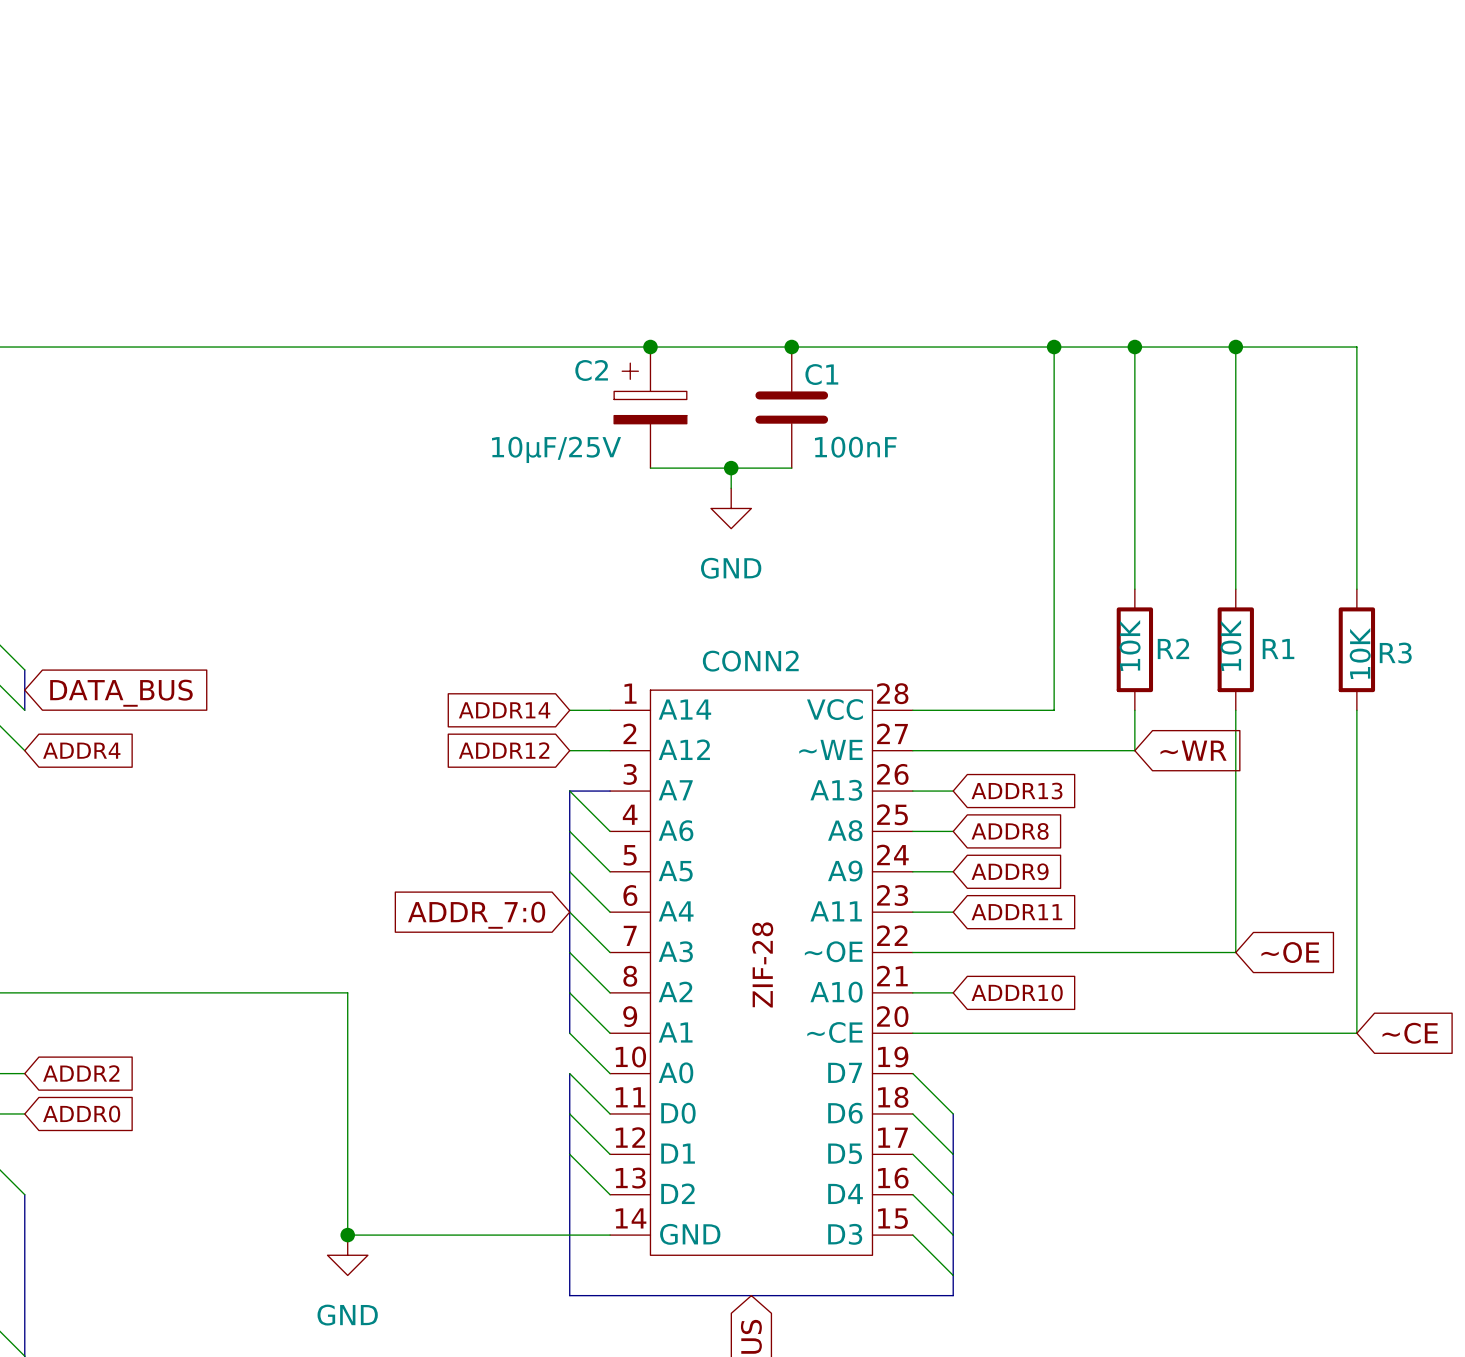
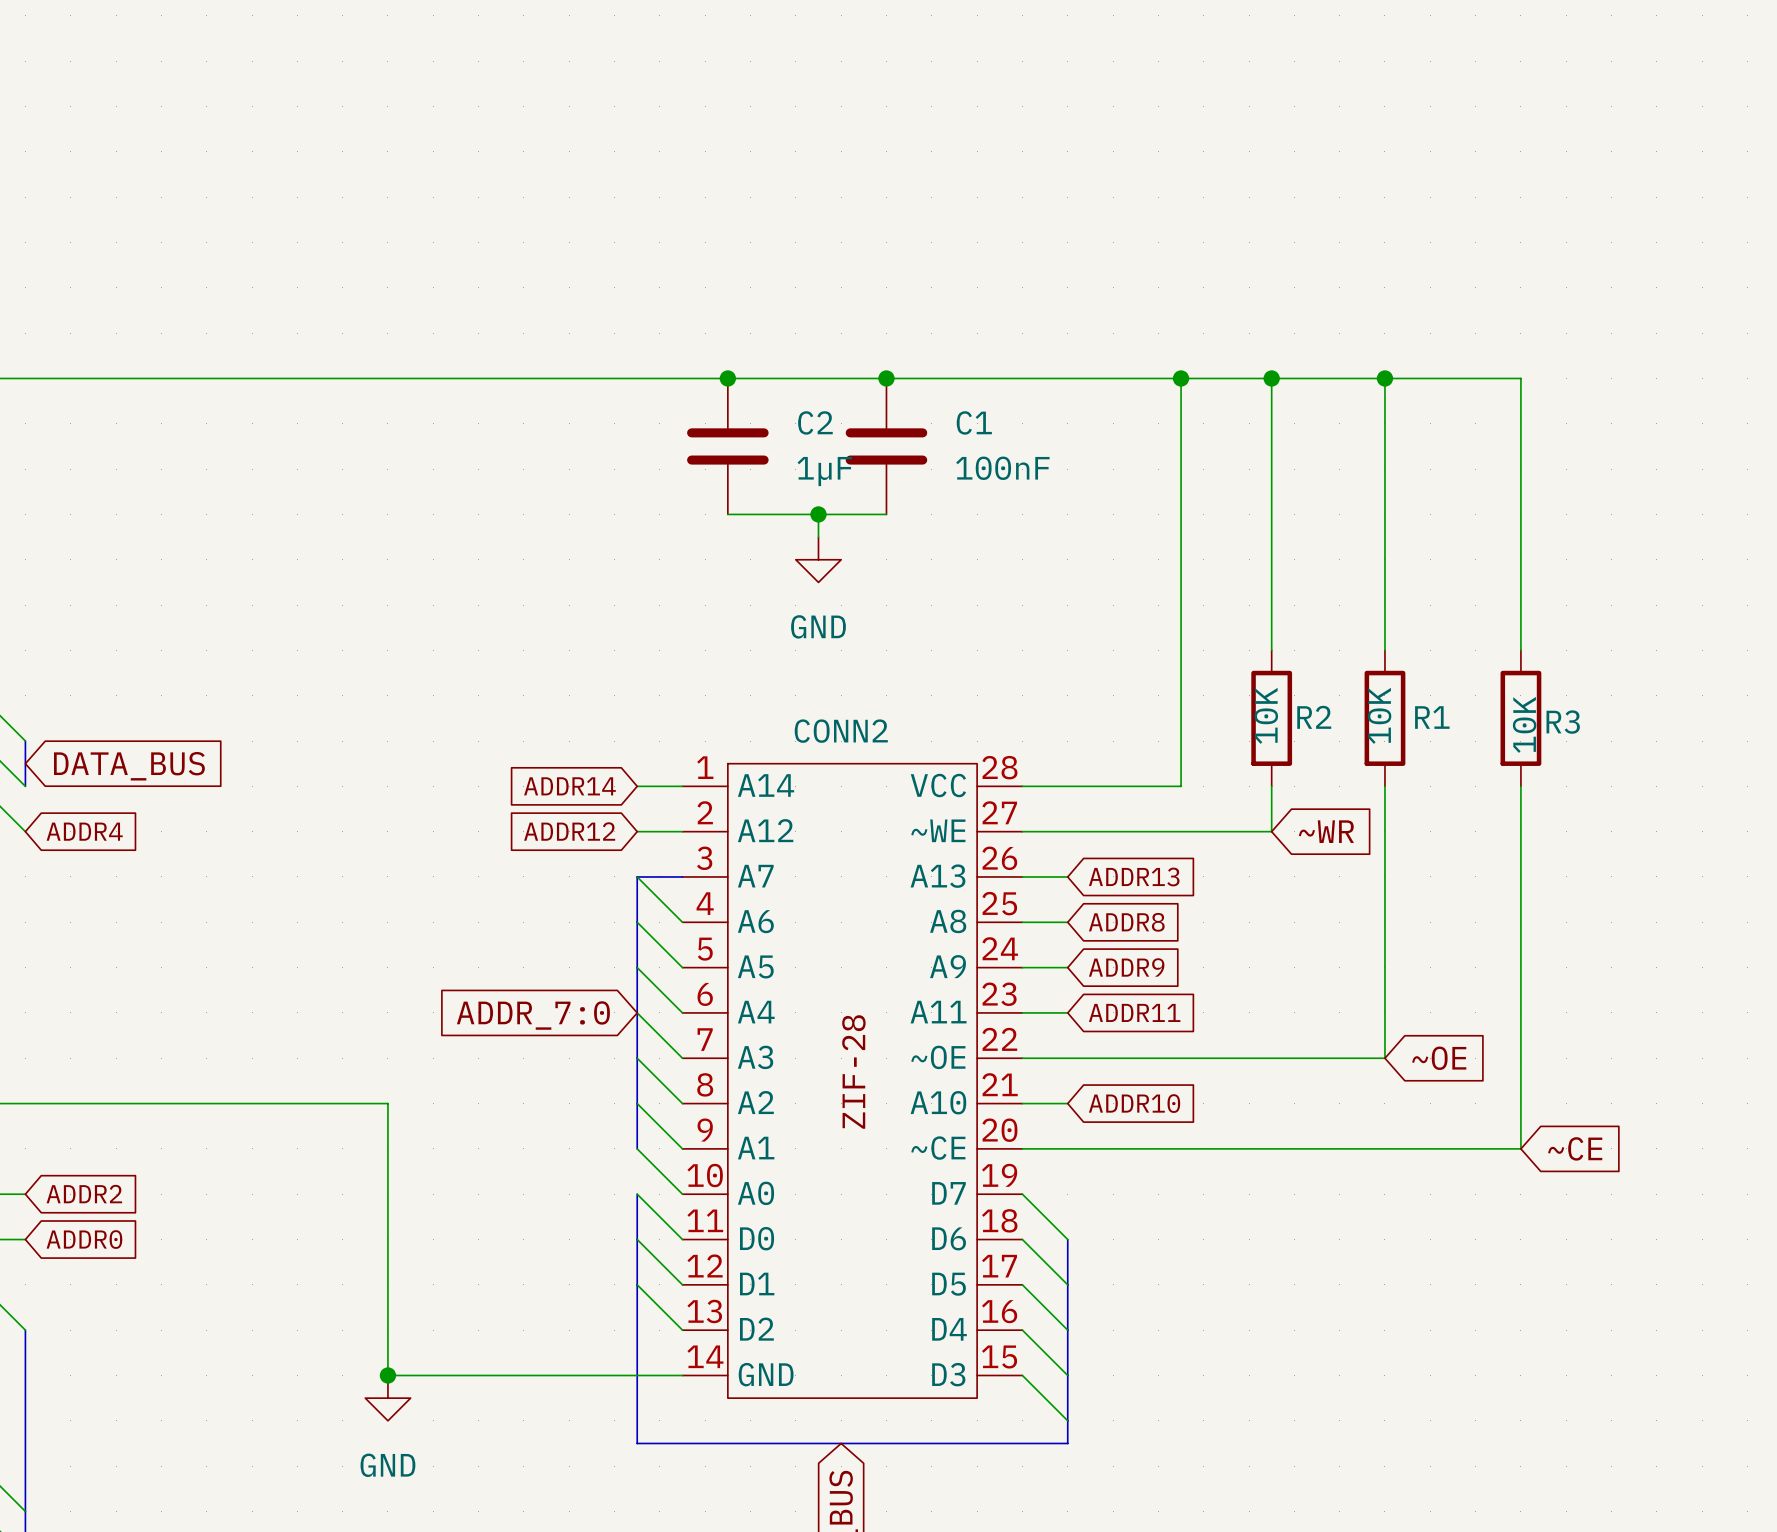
C2 symbol: [614, 347, 687, 469] -> [687, 378, 769, 515]
C2 name position: C2 (591, 370) -> C2 (815, 422)
C1 name position: C1 (821, 374) -> C1 (974, 422)
C1 value position: 100nF (855, 447) -> 100nF (1002, 468)
C2 value: 10µF/25V (556, 449) -> 1µF (824, 471)

